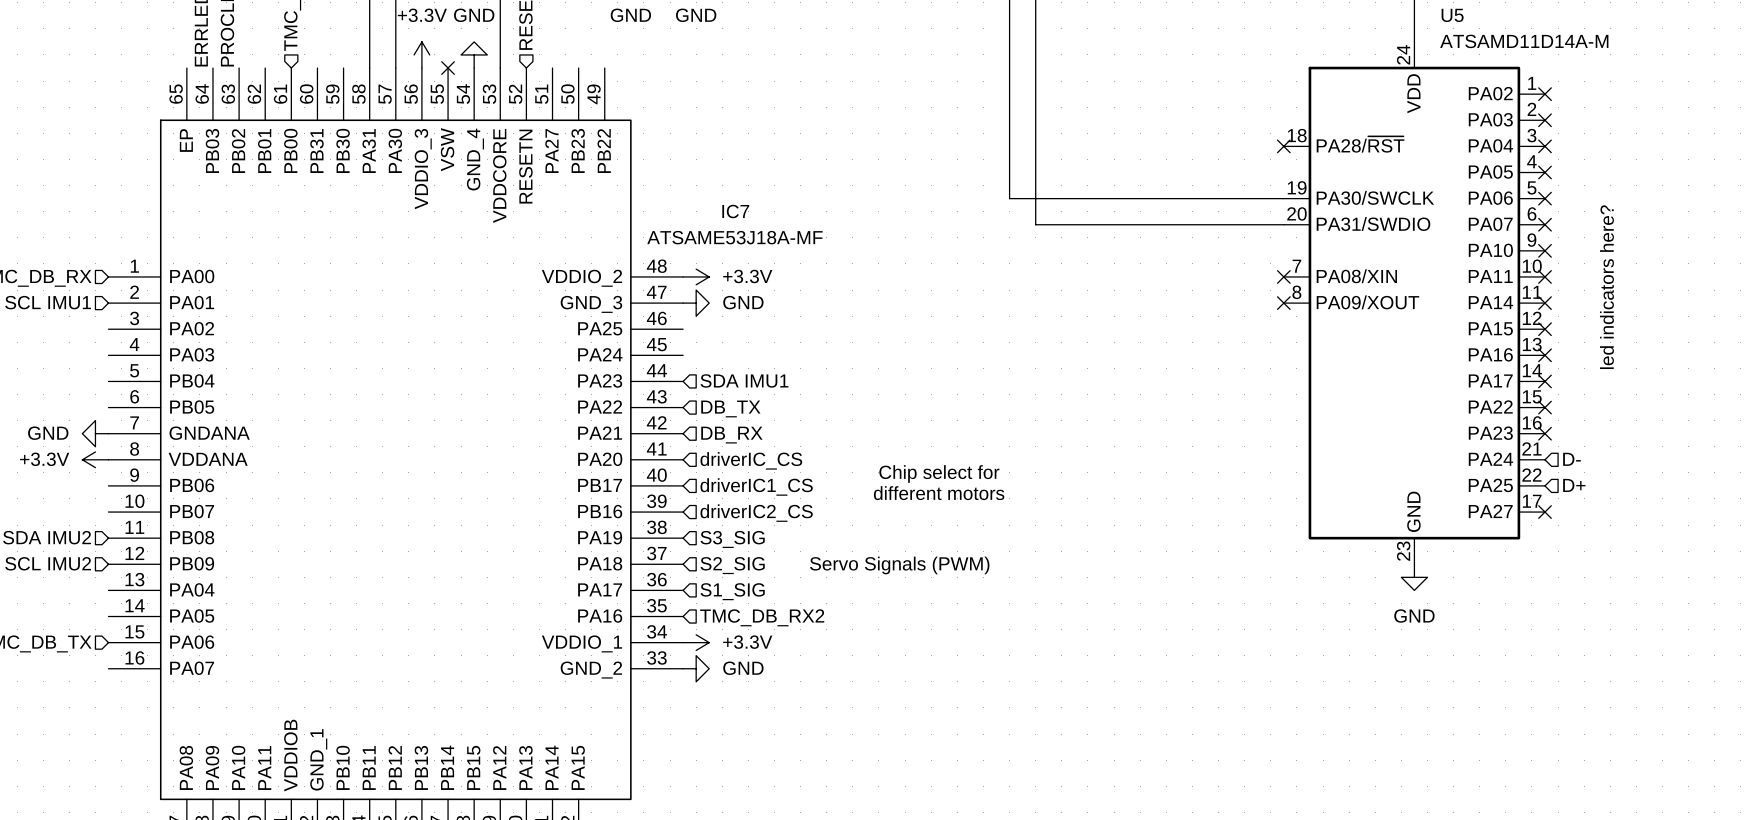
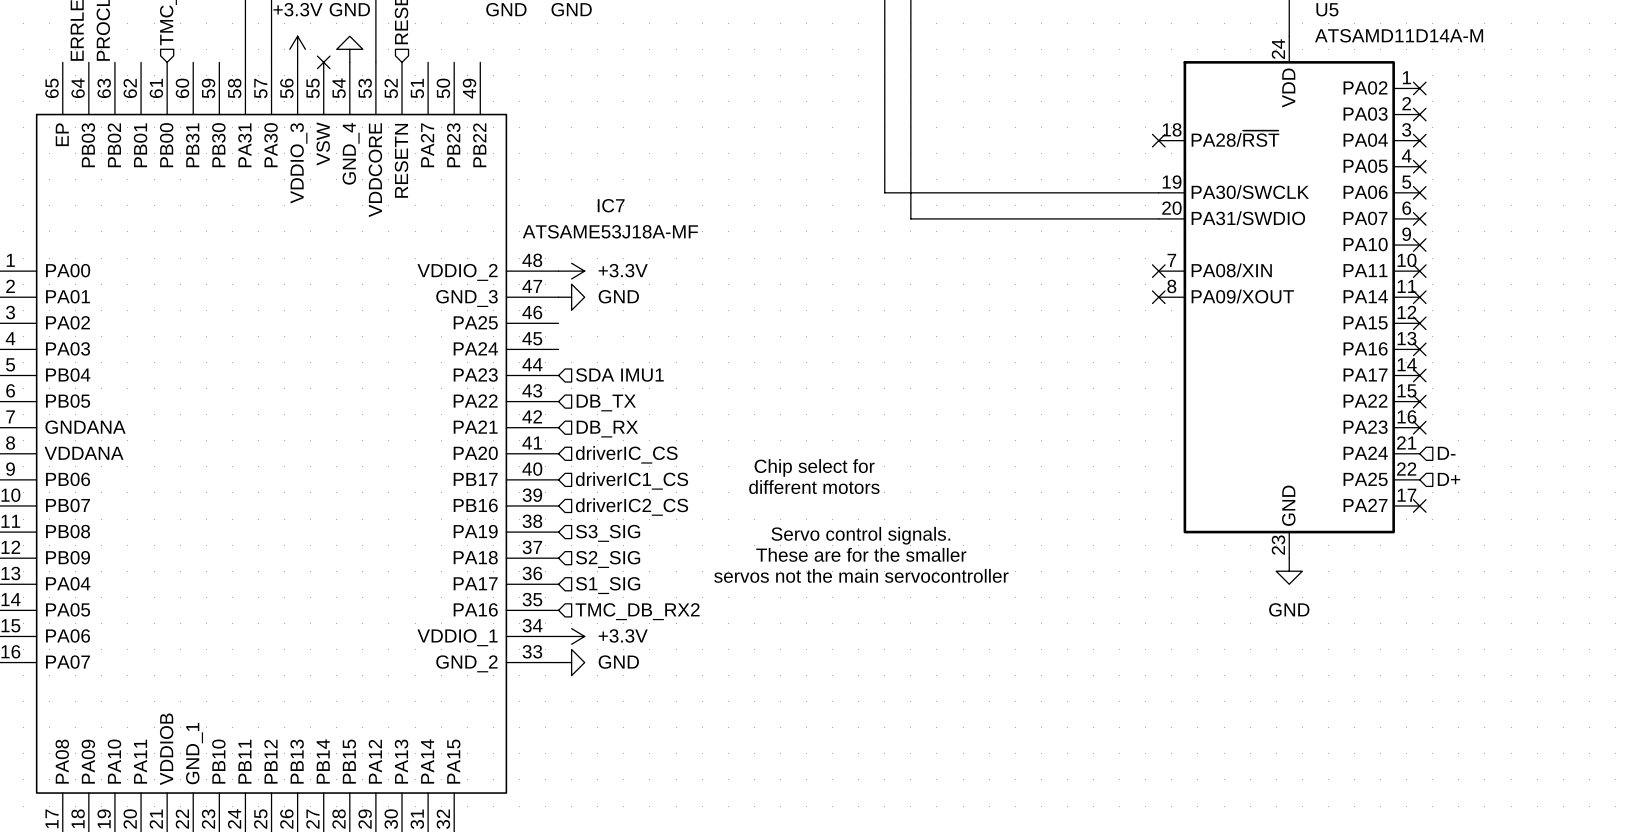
text: led indicators here? (1606, 287) -> none
text: none -> Servo control signals. (860, 535)
text: none -> These are for the smaller (861, 554)
text: Servo Signals (PWM) (899, 565) -> none
text: none -> servos not the main servocontroller (861, 575)

